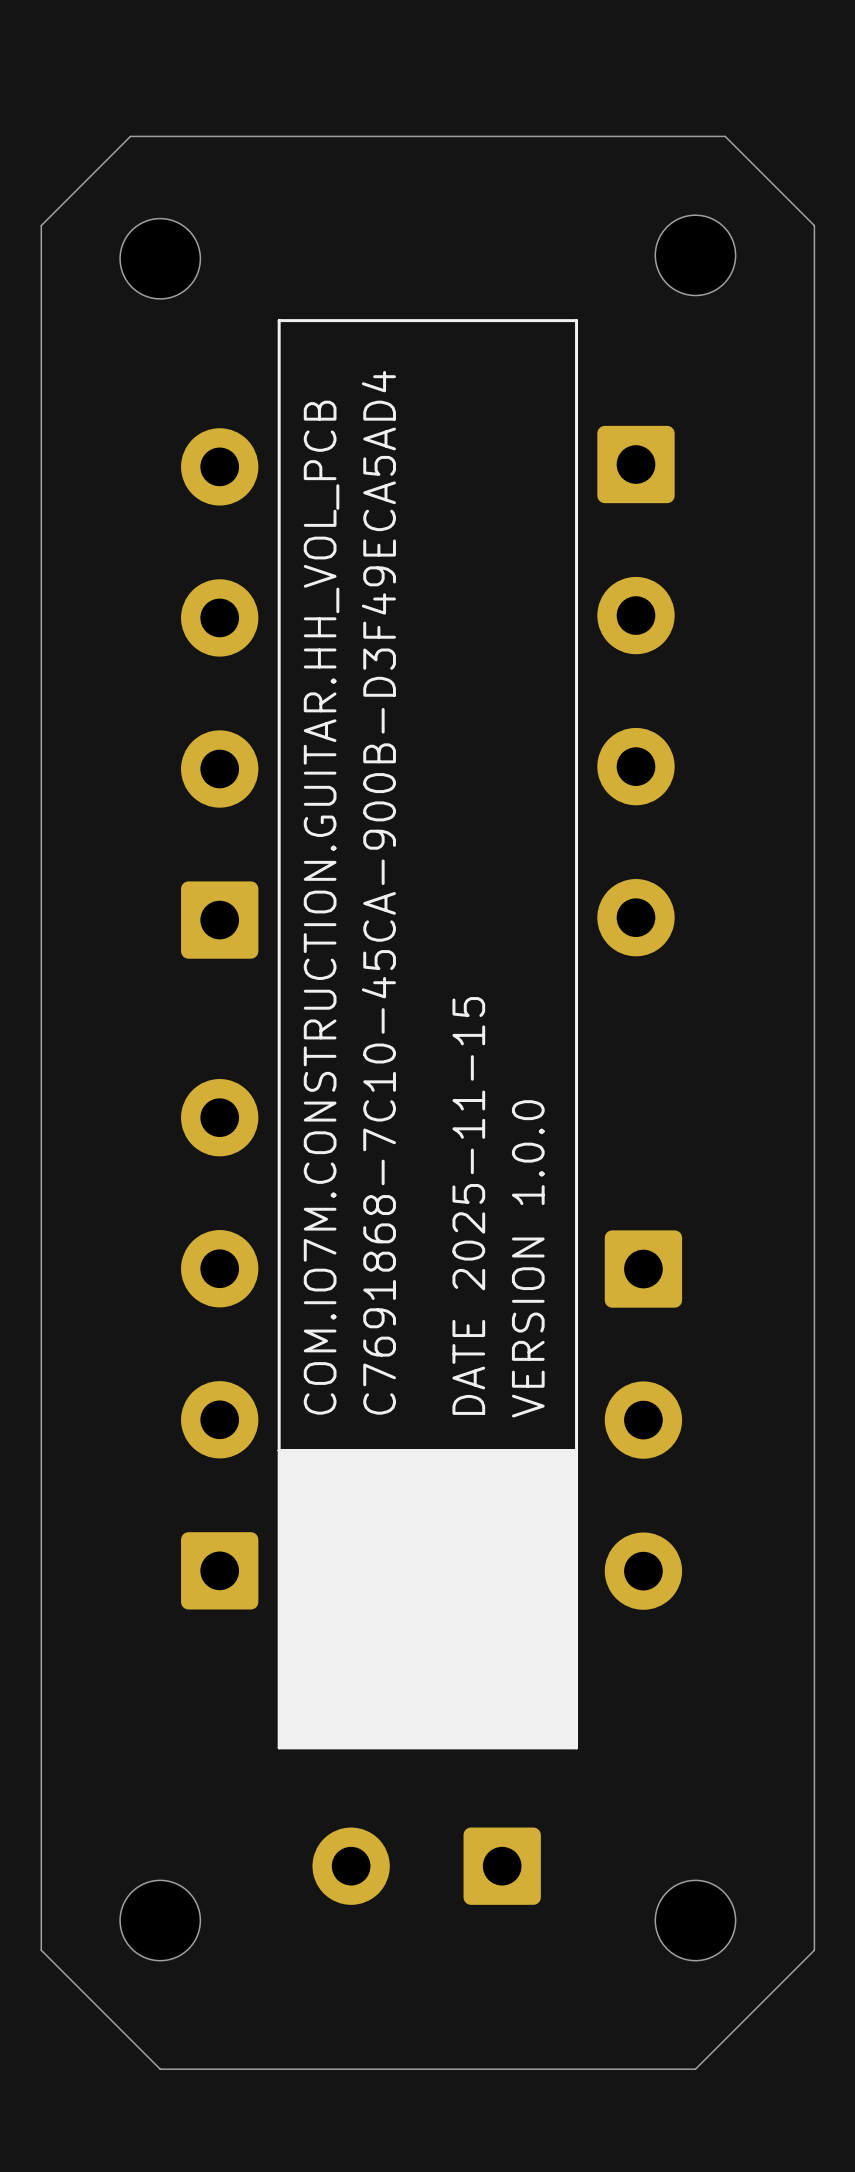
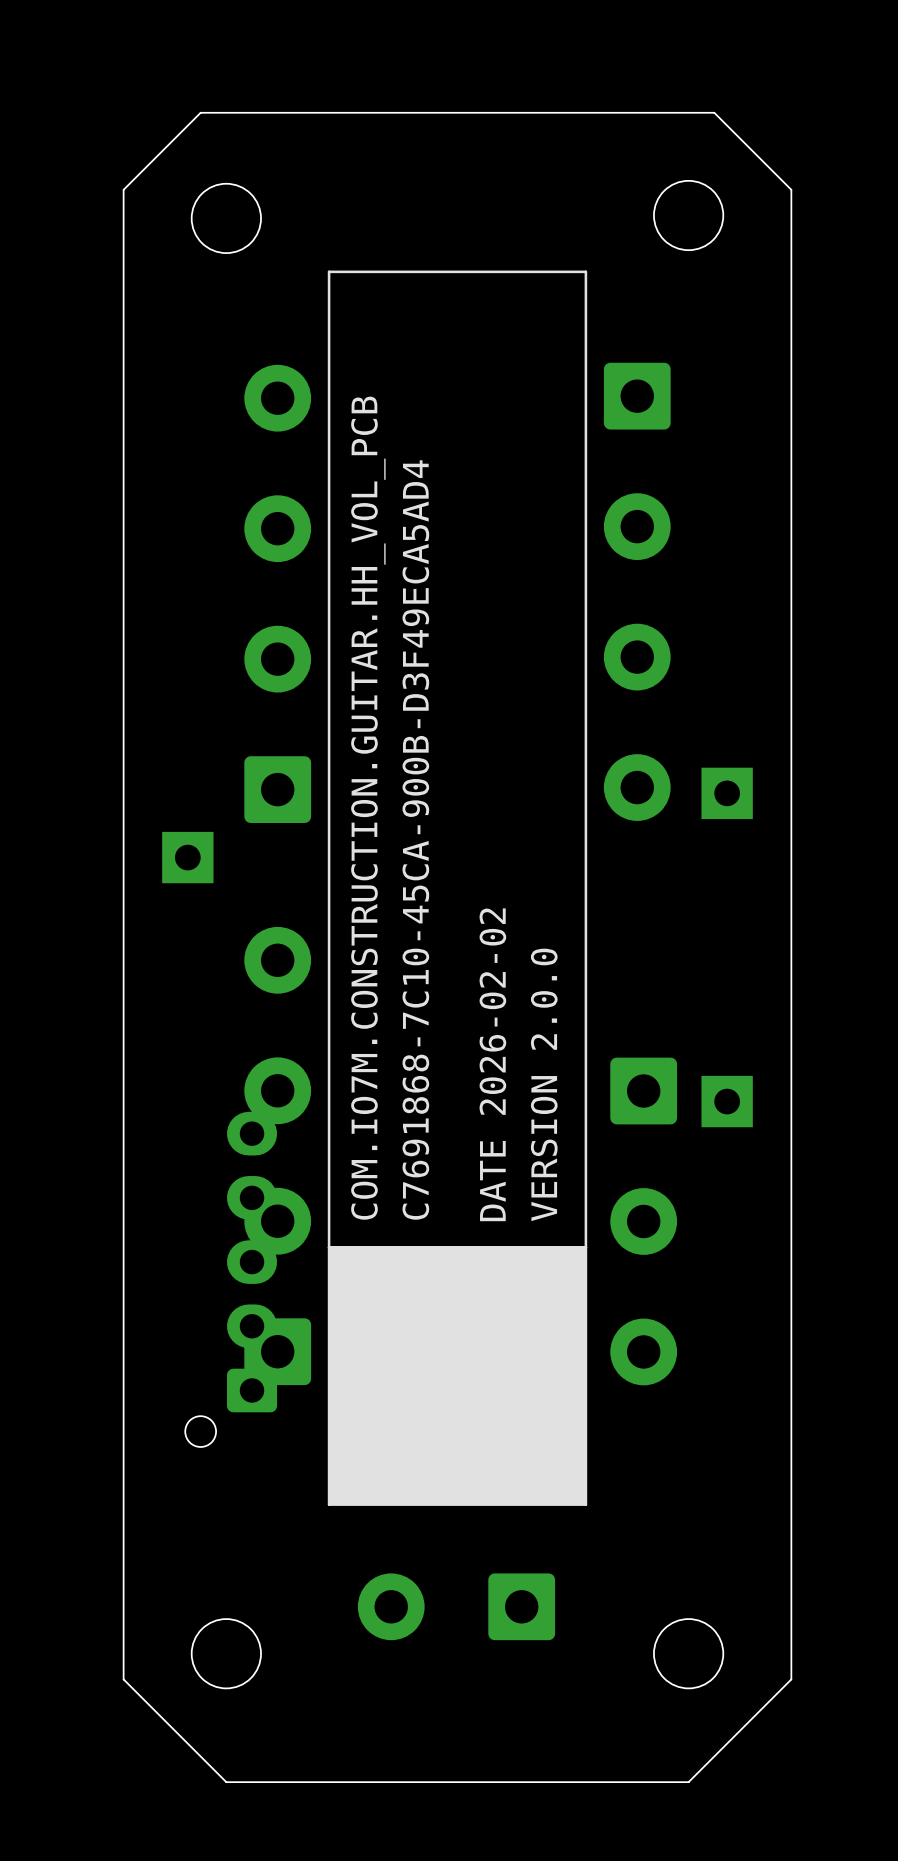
part: none -> (727, 793)
part: none -> (187, 857)
text: DATE 2025-11-15 (468, 1205) -> DATE 2026-02-02 (492, 1064)
text: VERSION 1.0.0 (528, 1258) -> VERSION 2.0.0 (544, 1084)
part: none -> (727, 1101)
part: none -> (231, 1279)

